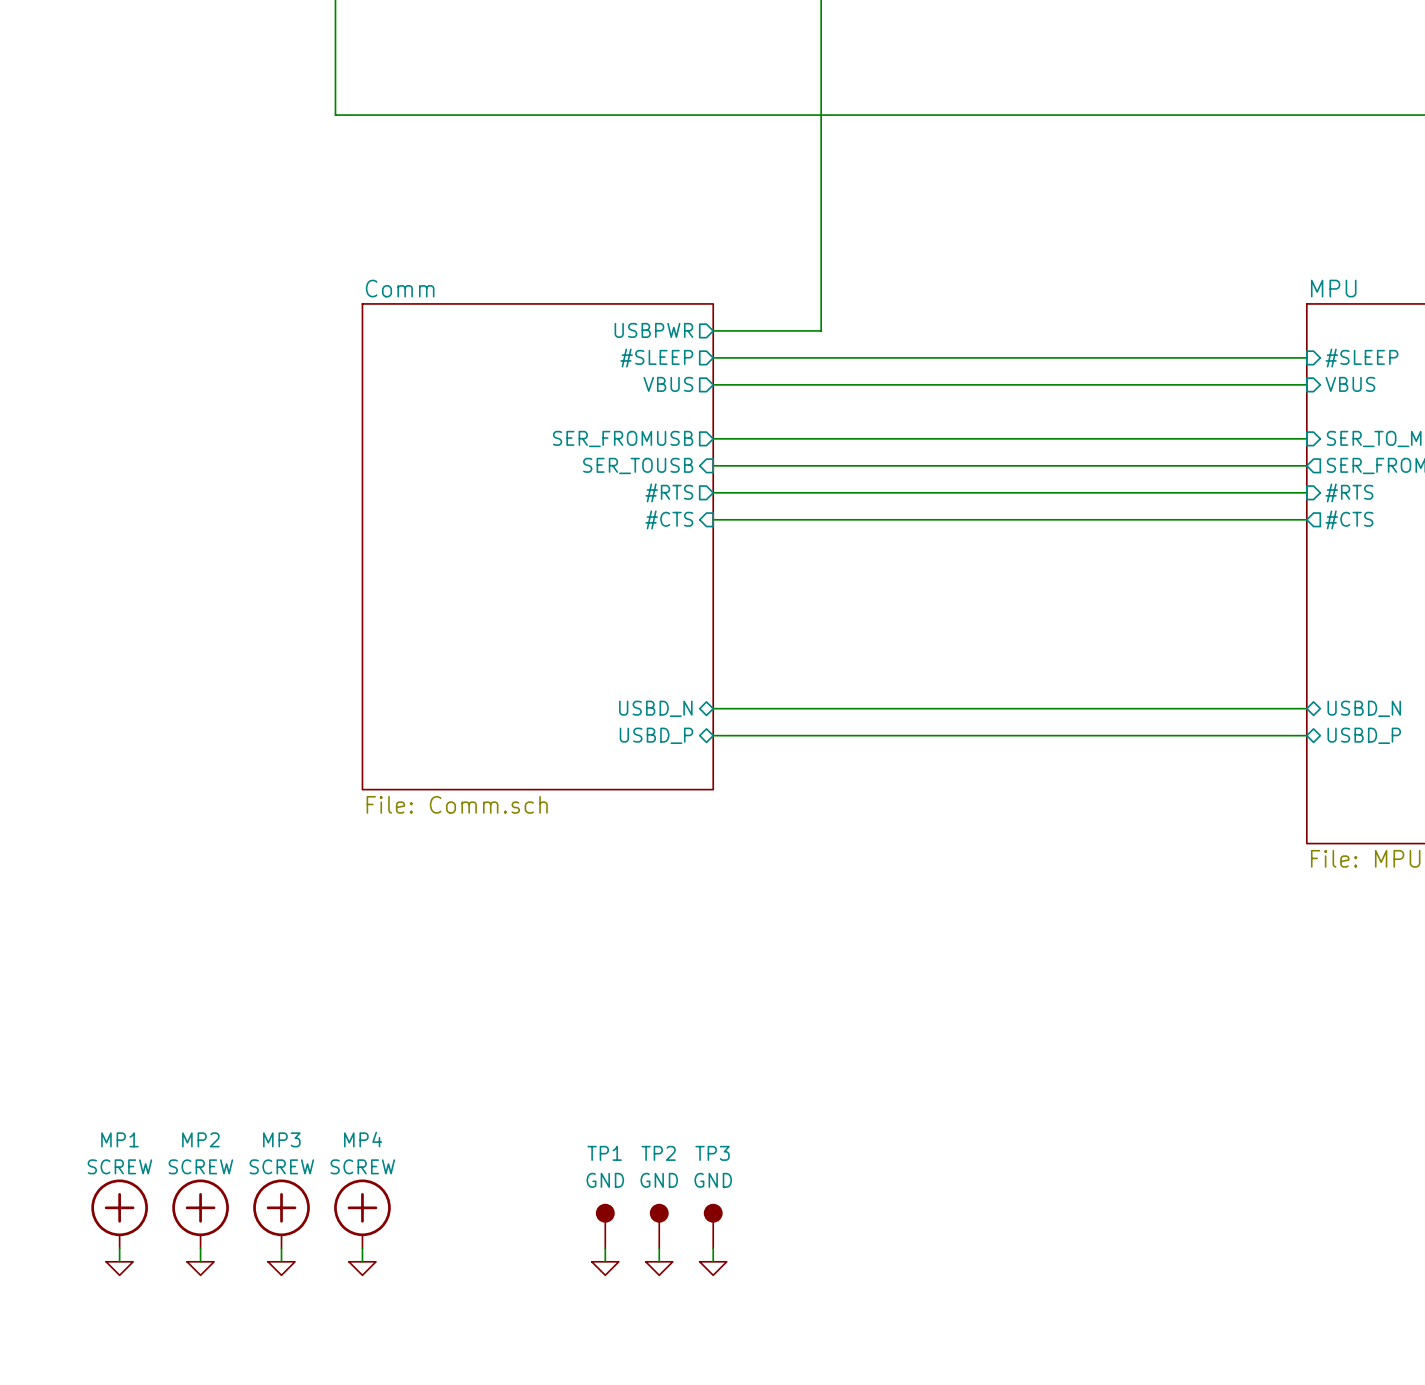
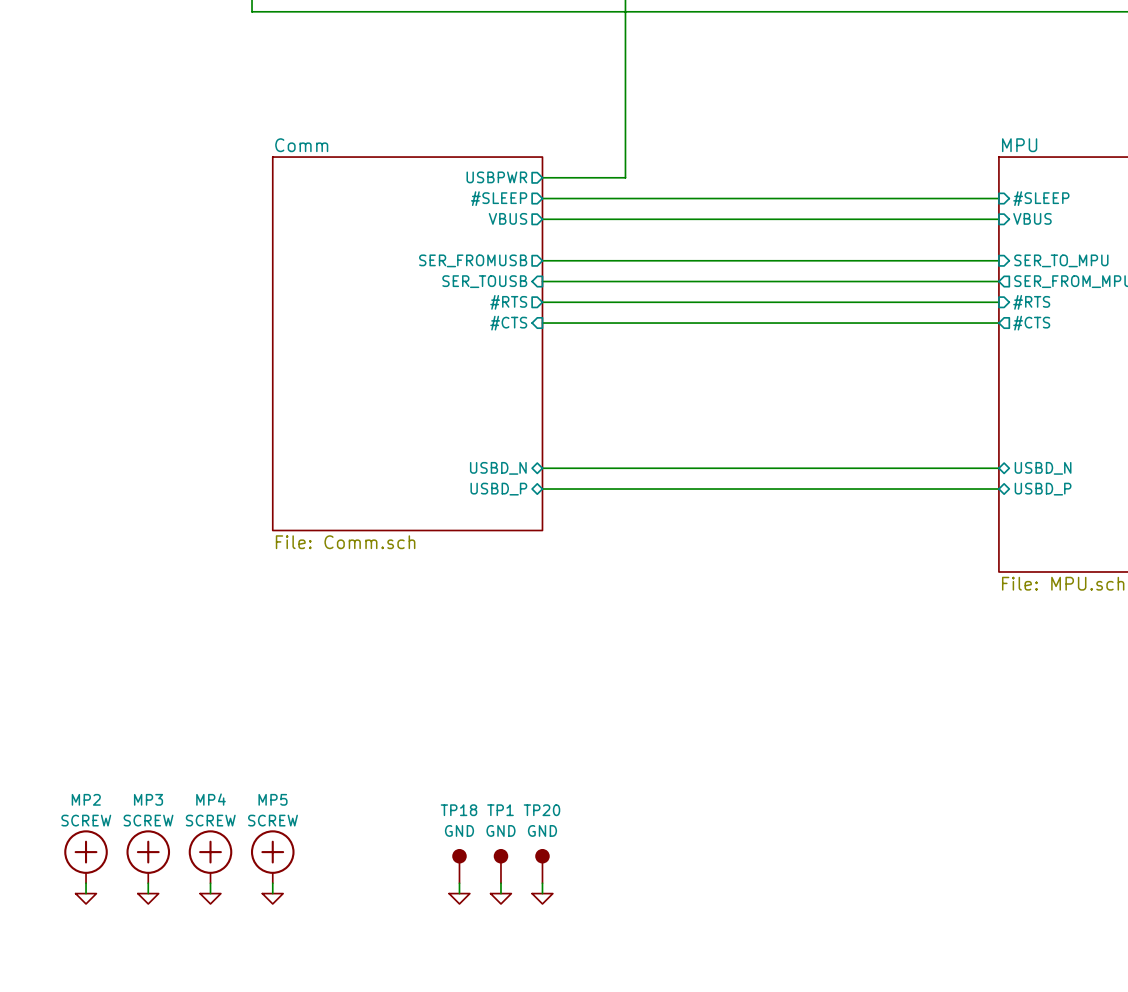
MP1 name: MP1 (119, 1139) -> MP2 (86, 799)
MP2 name: MP2 (200, 1139) -> MP3 (148, 799)
MP3 name: MP3 (281, 1139) -> MP4 (211, 799)
MP4 name: MP4 (363, 1139) -> MP5 (273, 799)
TP1 name: TP1 (604, 1153) -> TP18 (458, 810)
TP2 name: TP2 (658, 1153) -> TP1 (500, 810)
TP3 name: TP3 (712, 1153) -> TP20 (541, 810)

